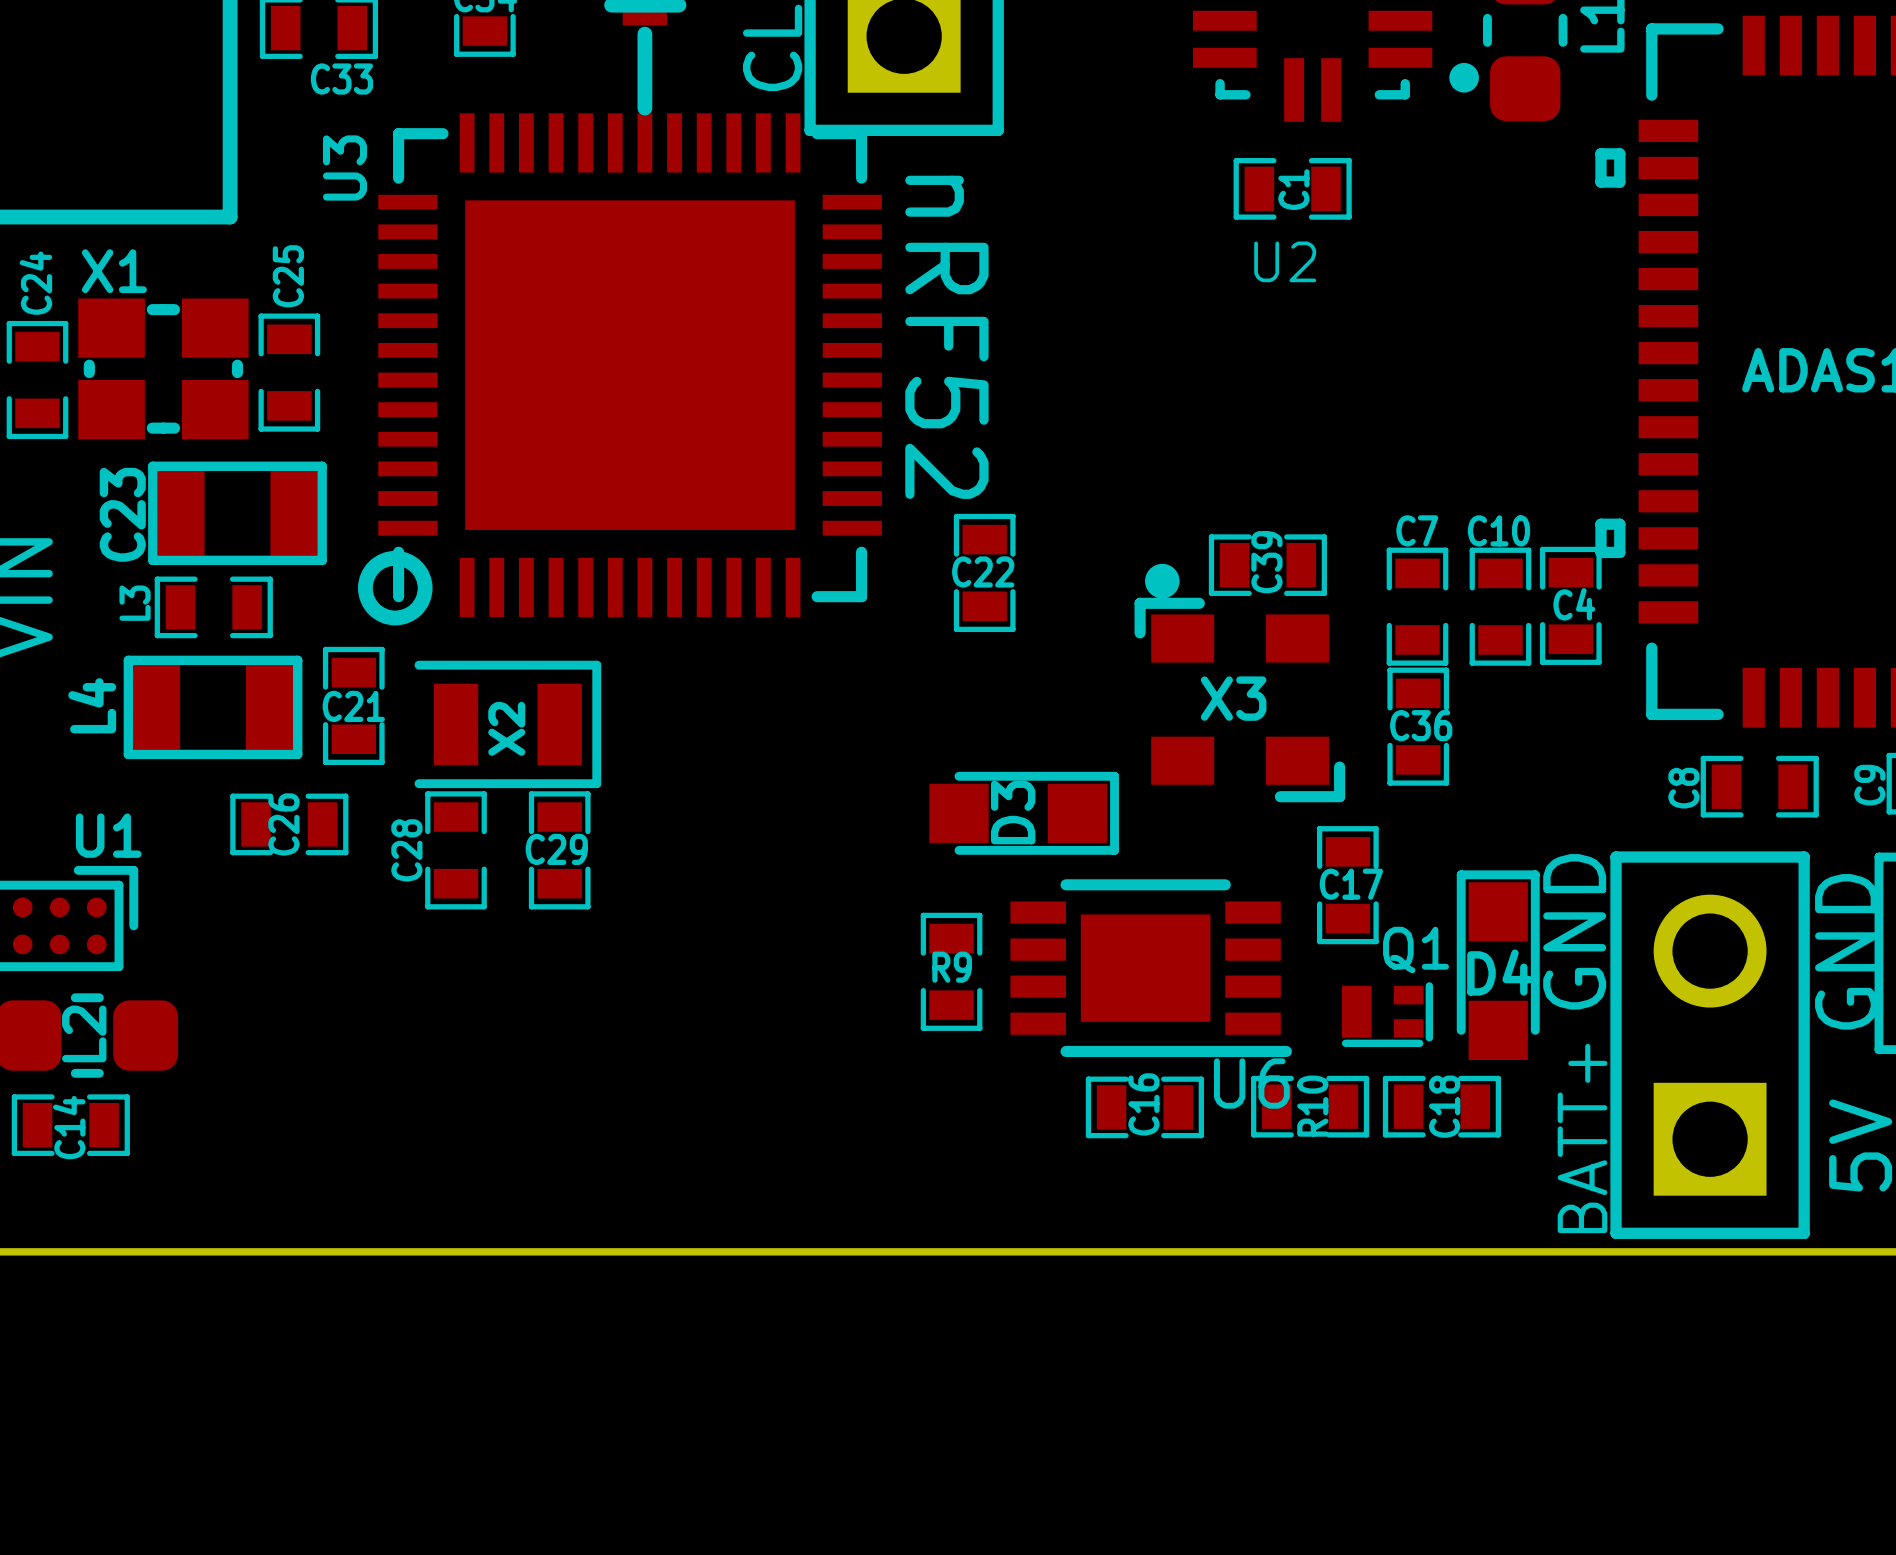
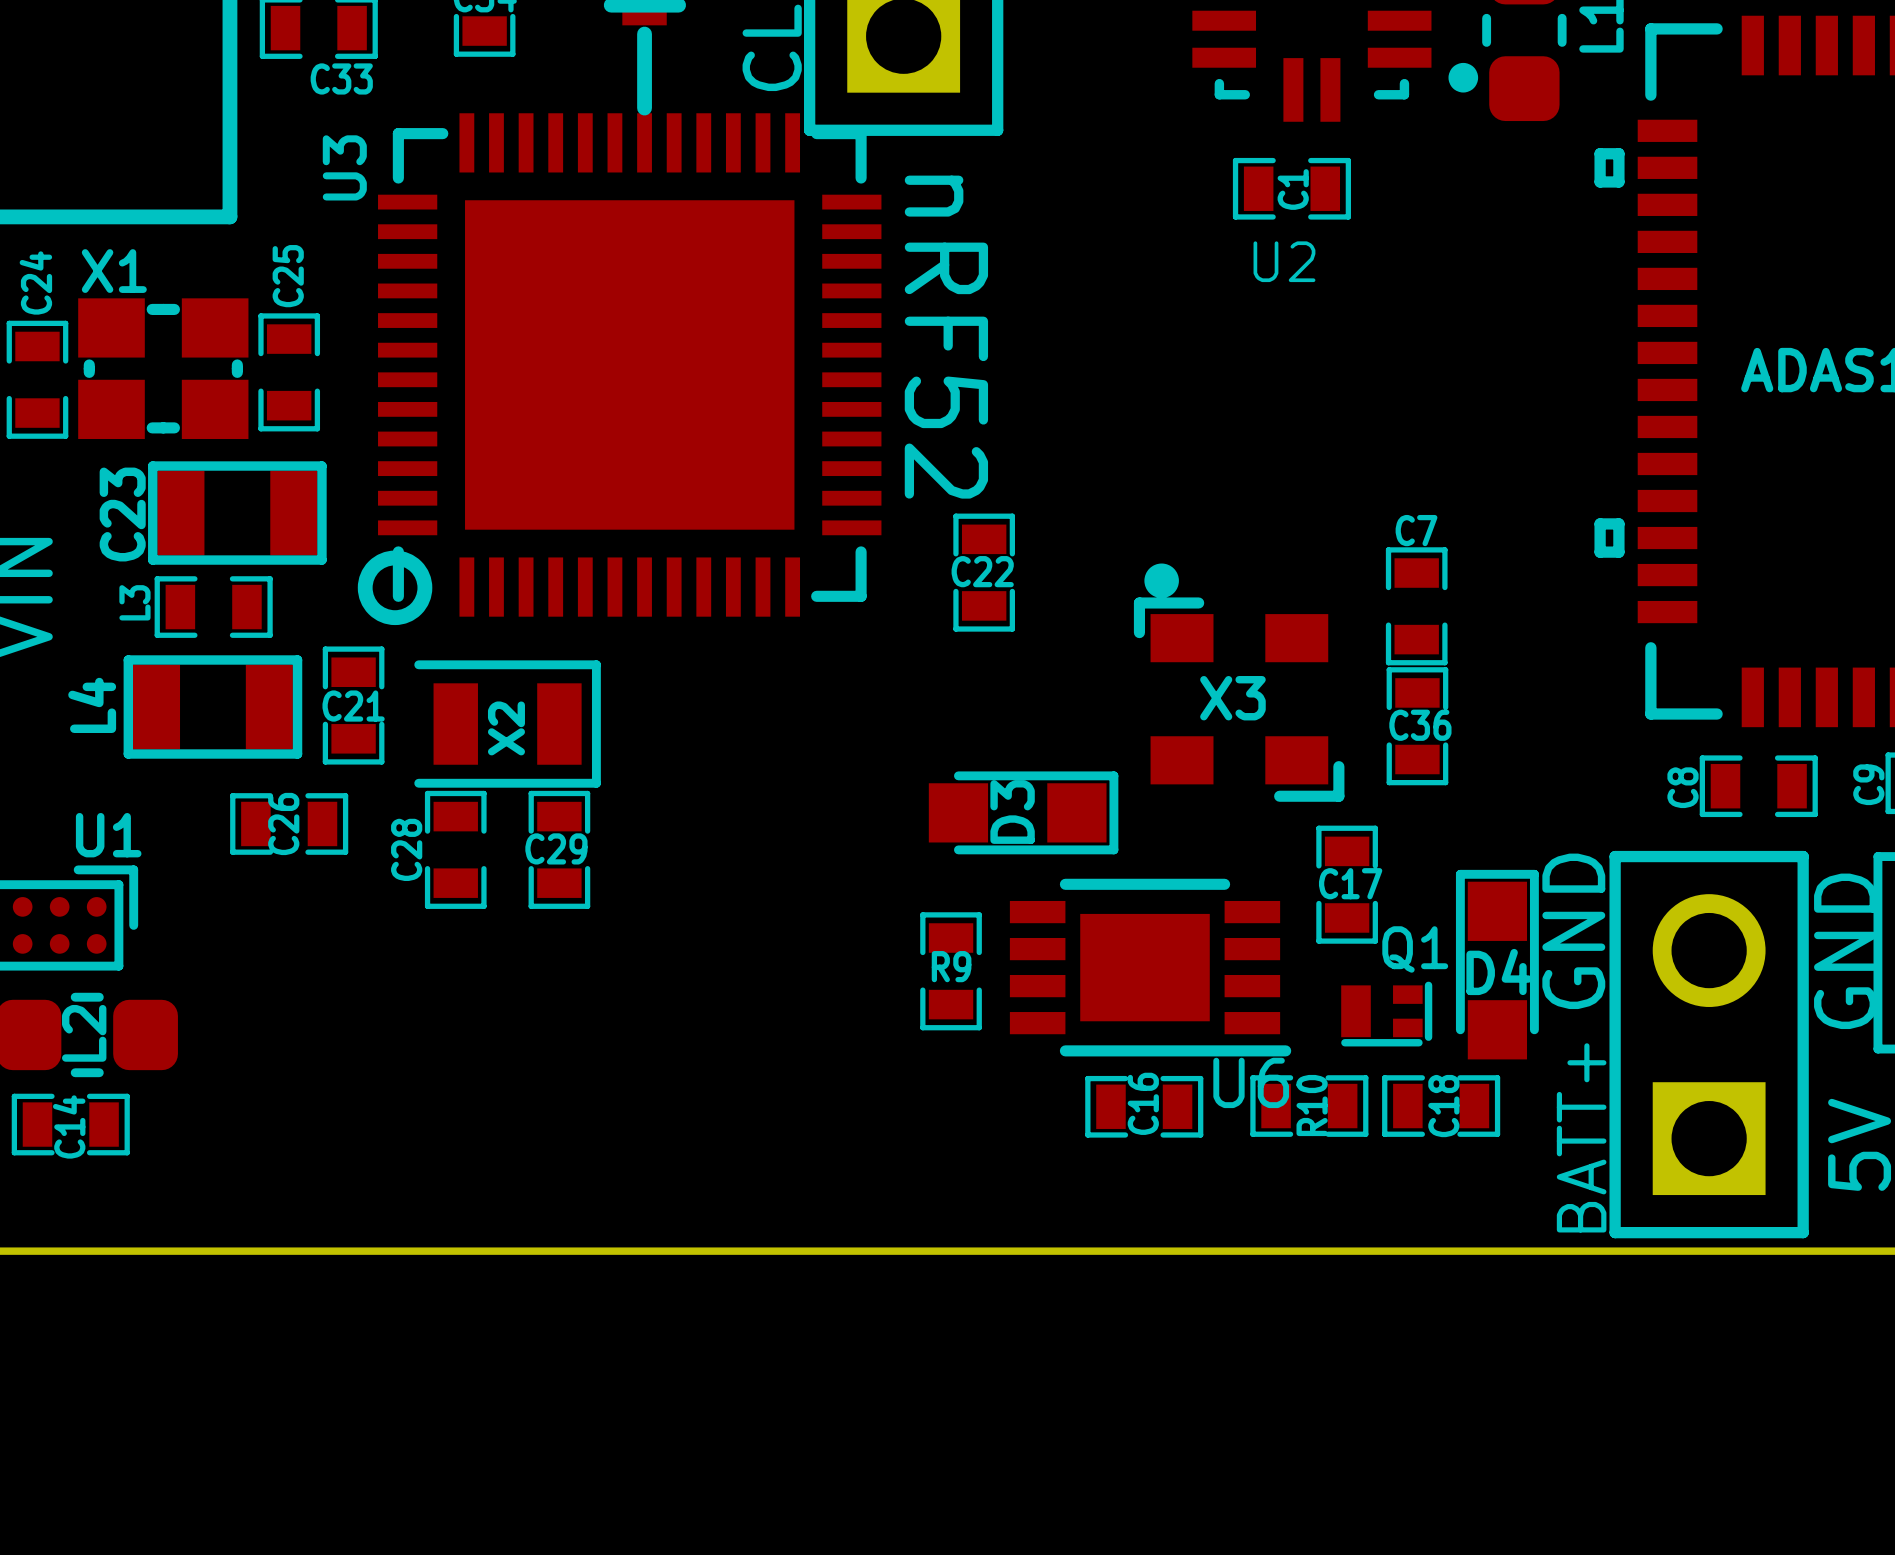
C39: (1267, 565) -> none
C4: (1570, 605) -> none
C10: (1500, 606) -> none

